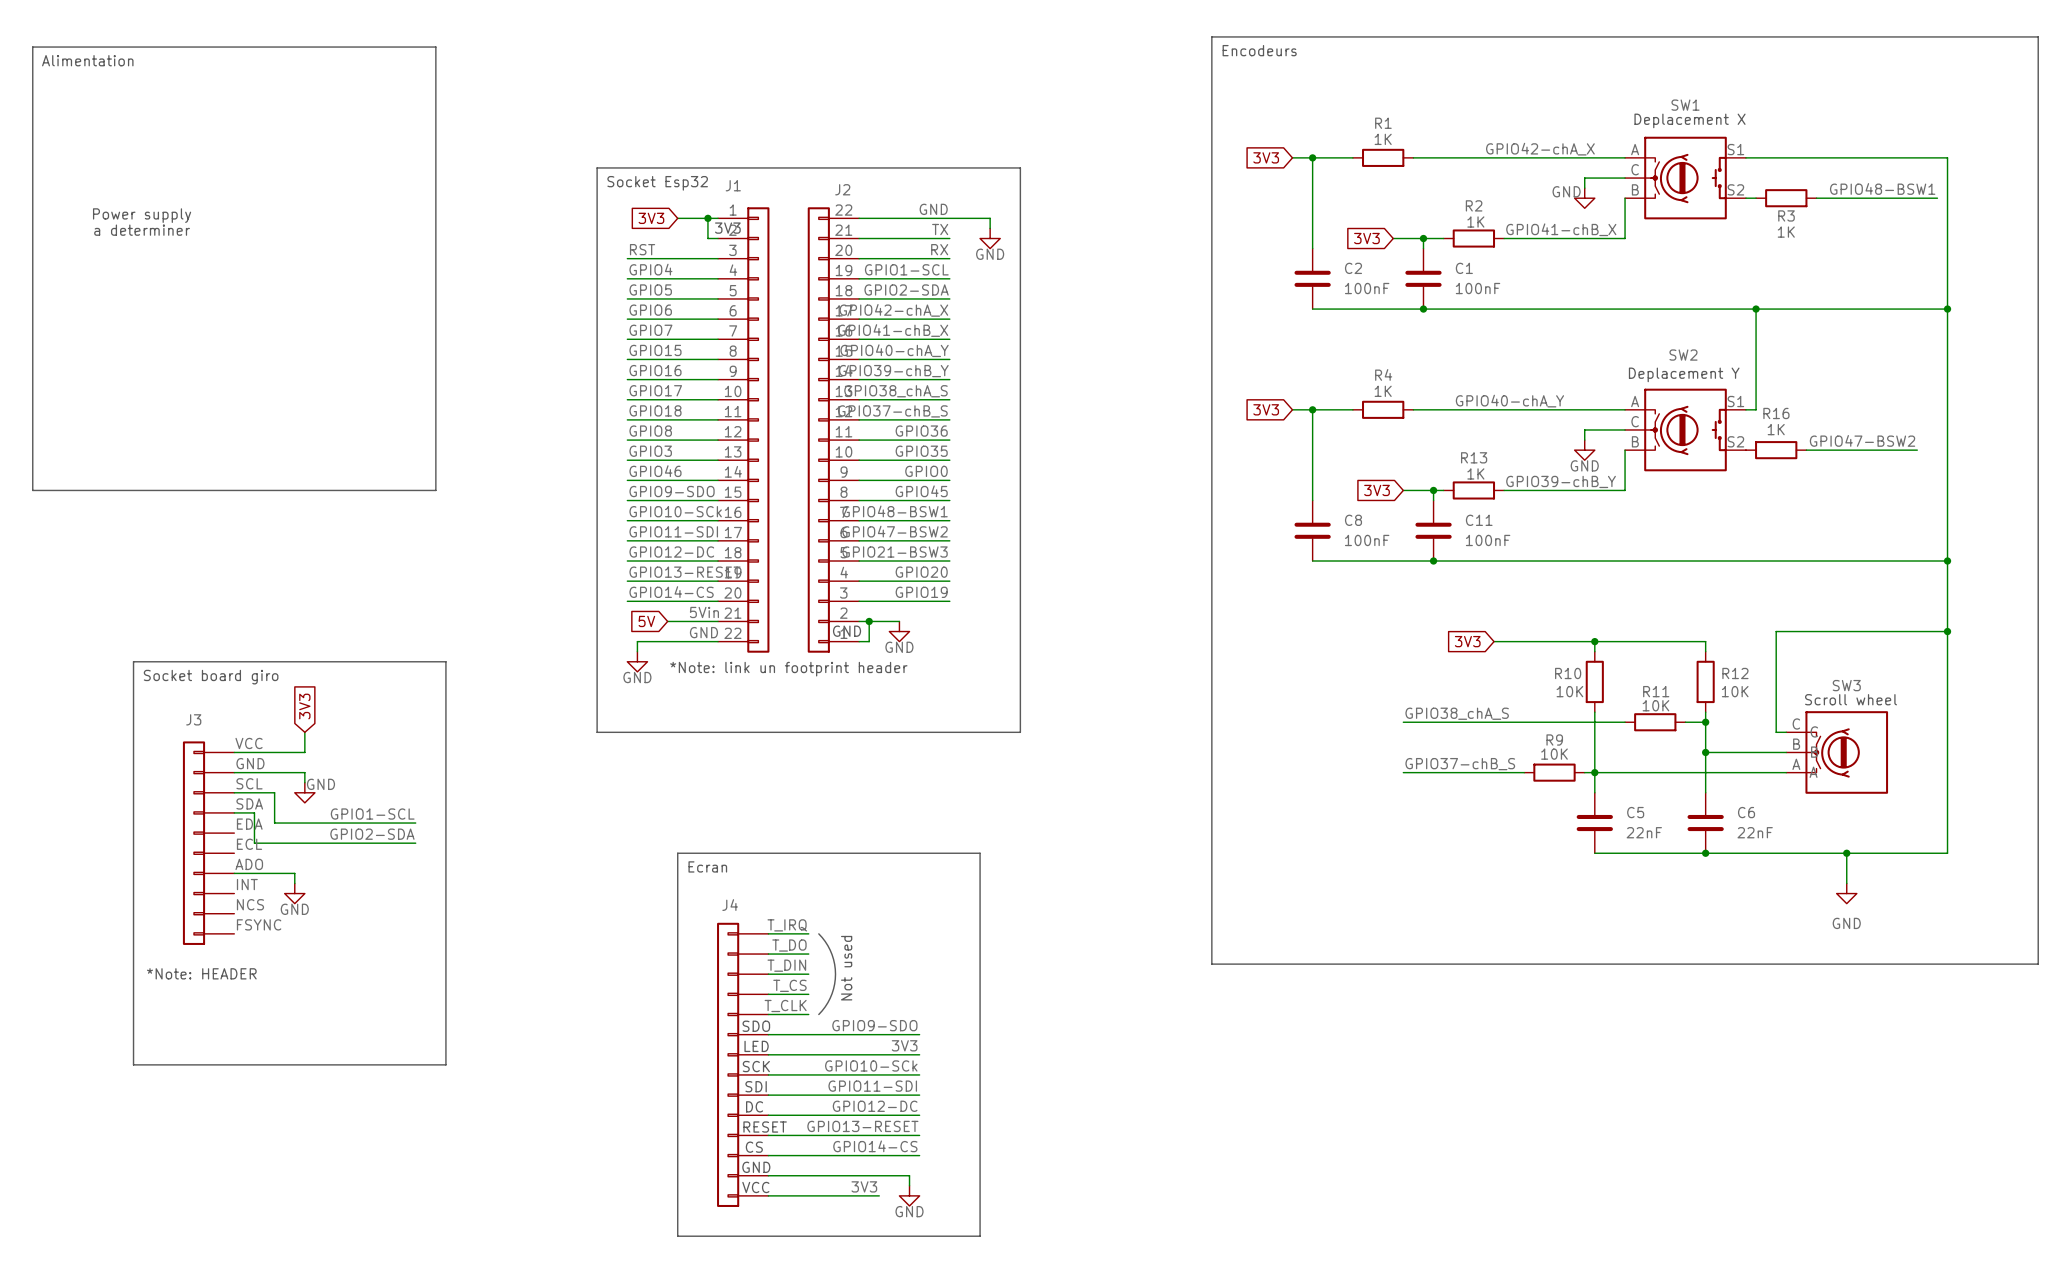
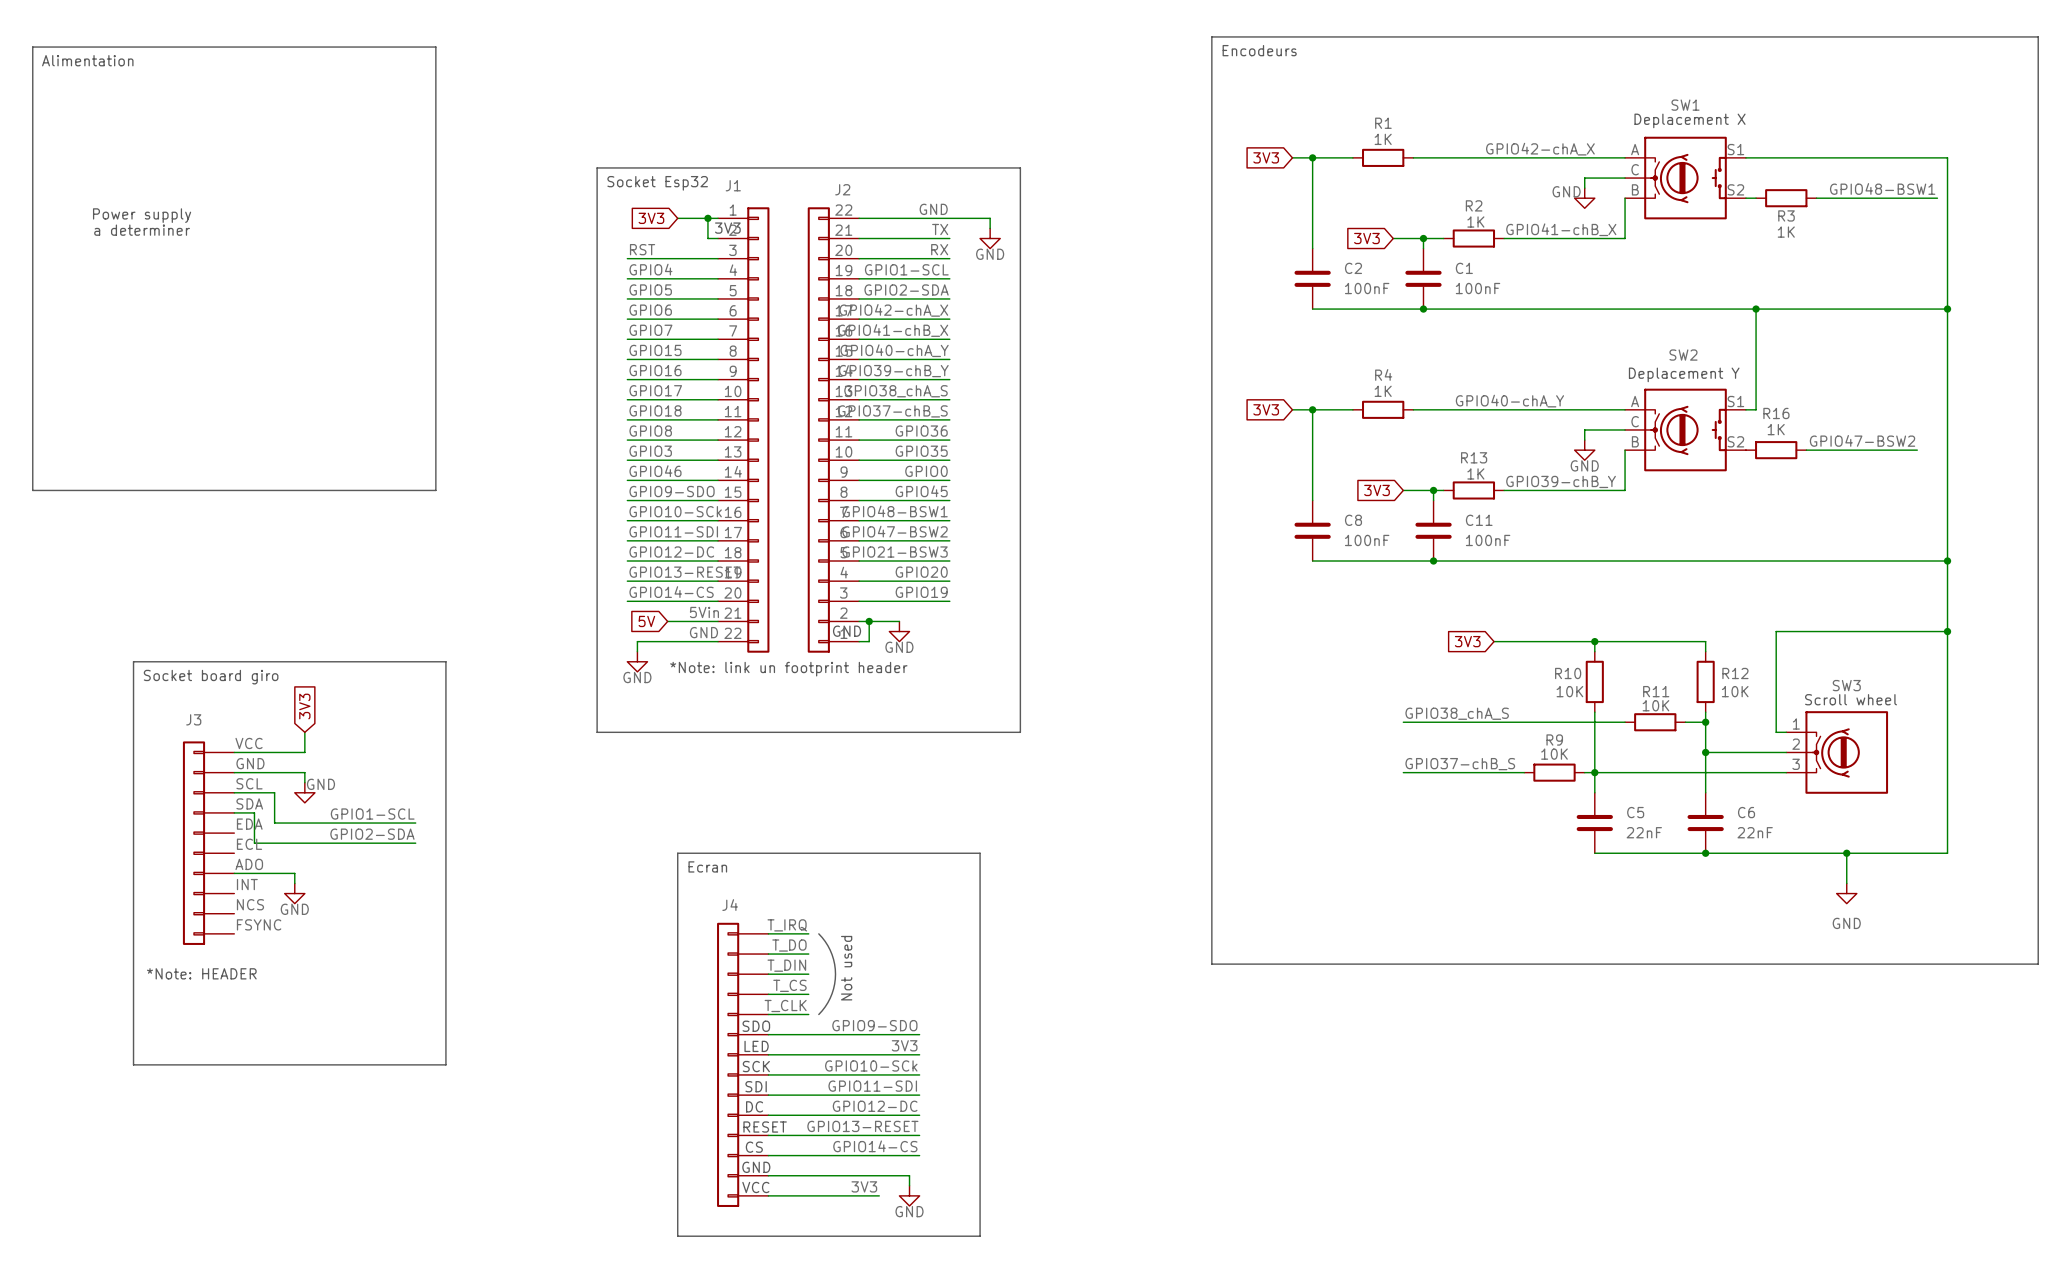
SW3 pin number: C (1796, 724) -> 1 (1796, 724)
SW3 pin name: C (1814, 731) -> none
SW3 pin number: B (1796, 744) -> 2 (1796, 744)
SW3 pin name: B (1814, 752) -> none
SW3 pin number: A (1796, 764) -> 3 (1796, 764)
SW3 pin name: A (1813, 772) -> none

